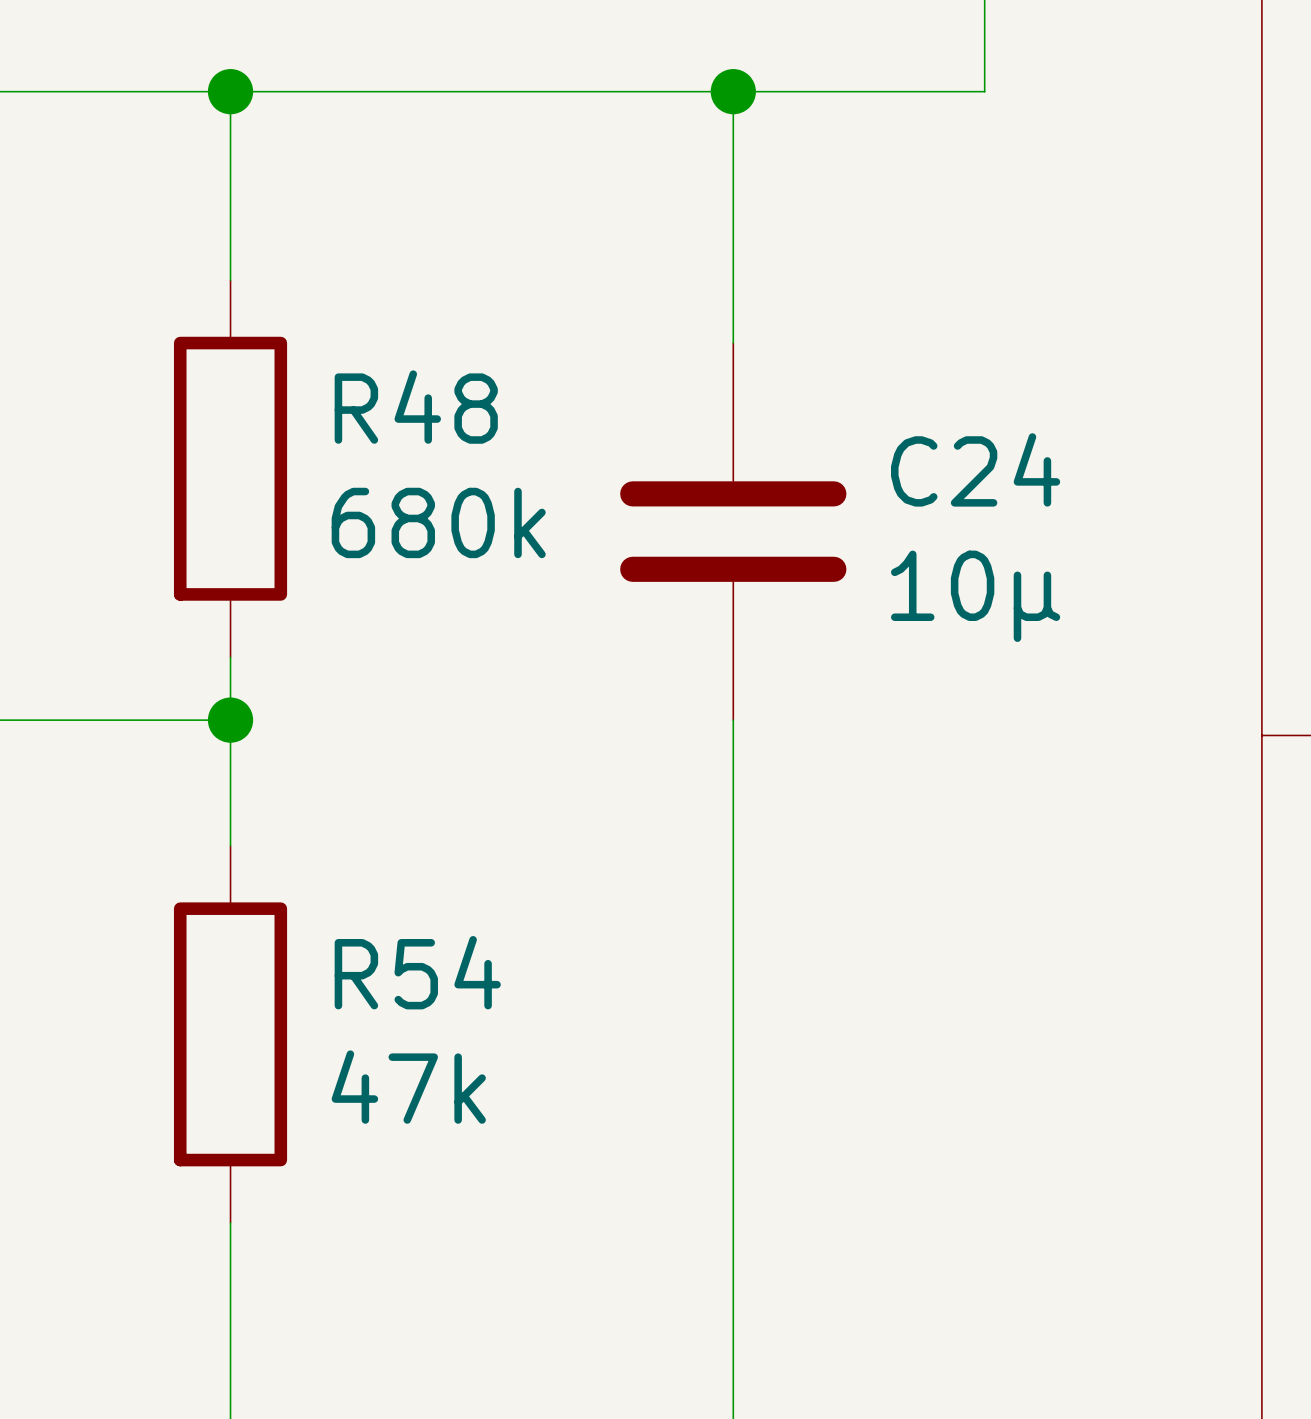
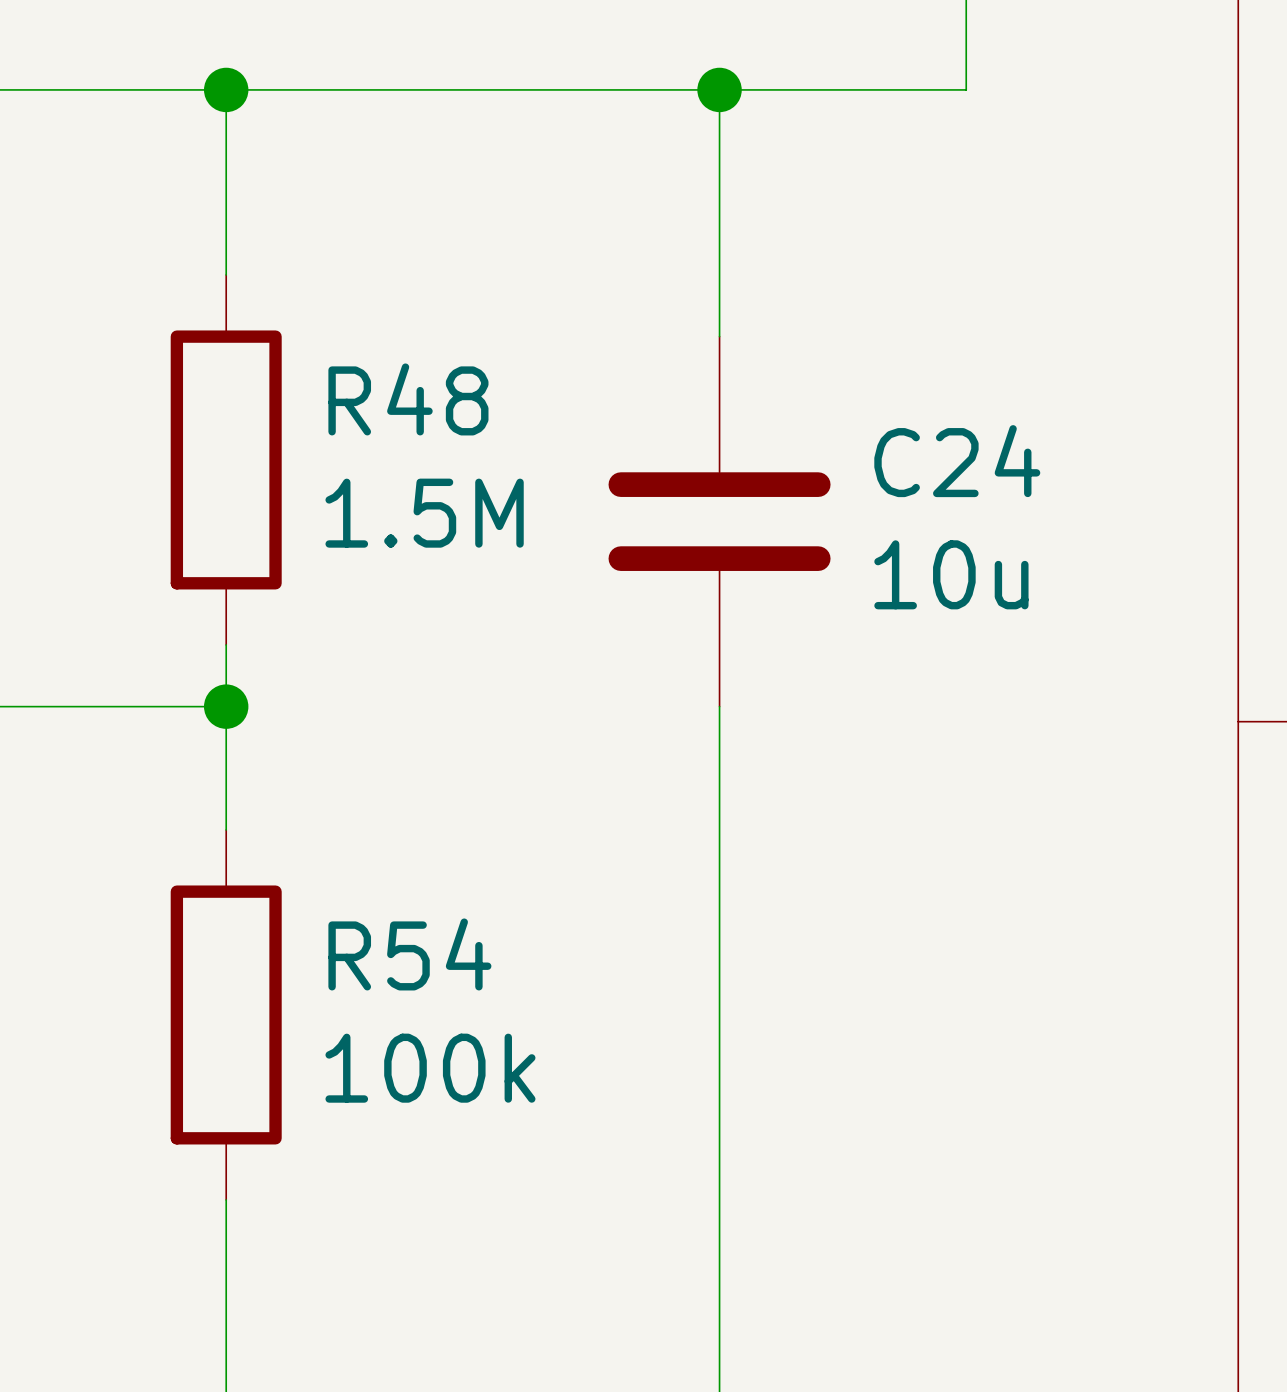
R48 value: 680k (438, 522) -> 1.5M (424, 513)
C24 value: 10µ (975, 596) -> 10u (951, 574)
R54 value: 47k (408, 1087) -> 100k (430, 1068)

